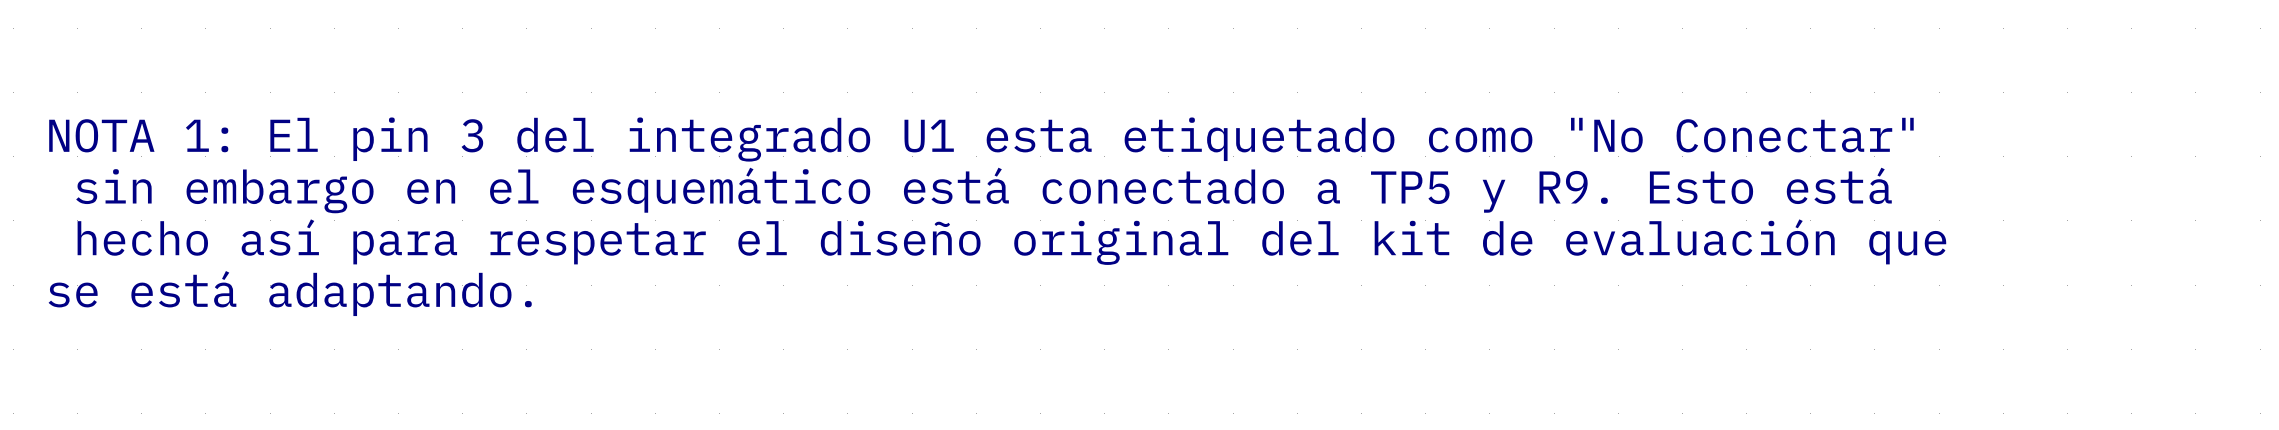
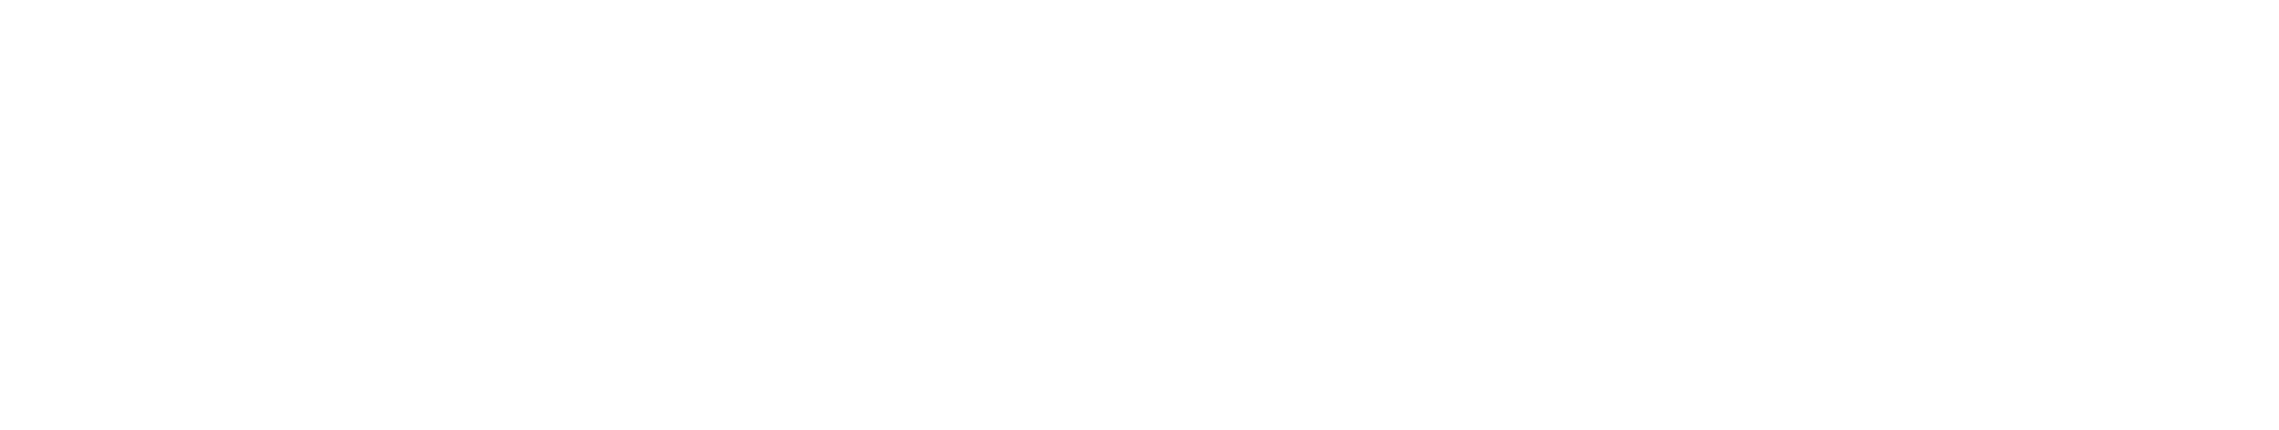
text: NOTA 1: El pin 3 del integrado U1 esta etiquetado como "No Conectar" (981, 139) -> none
text: sin embargo en el esquemático está conectado a TP5 y R9. Esto está (983, 190) -> none
text: hecho así para respetar el diseño original del kit de evaluación que (1011, 242) -> none
text: se está adaptando. (290, 293) -> none

